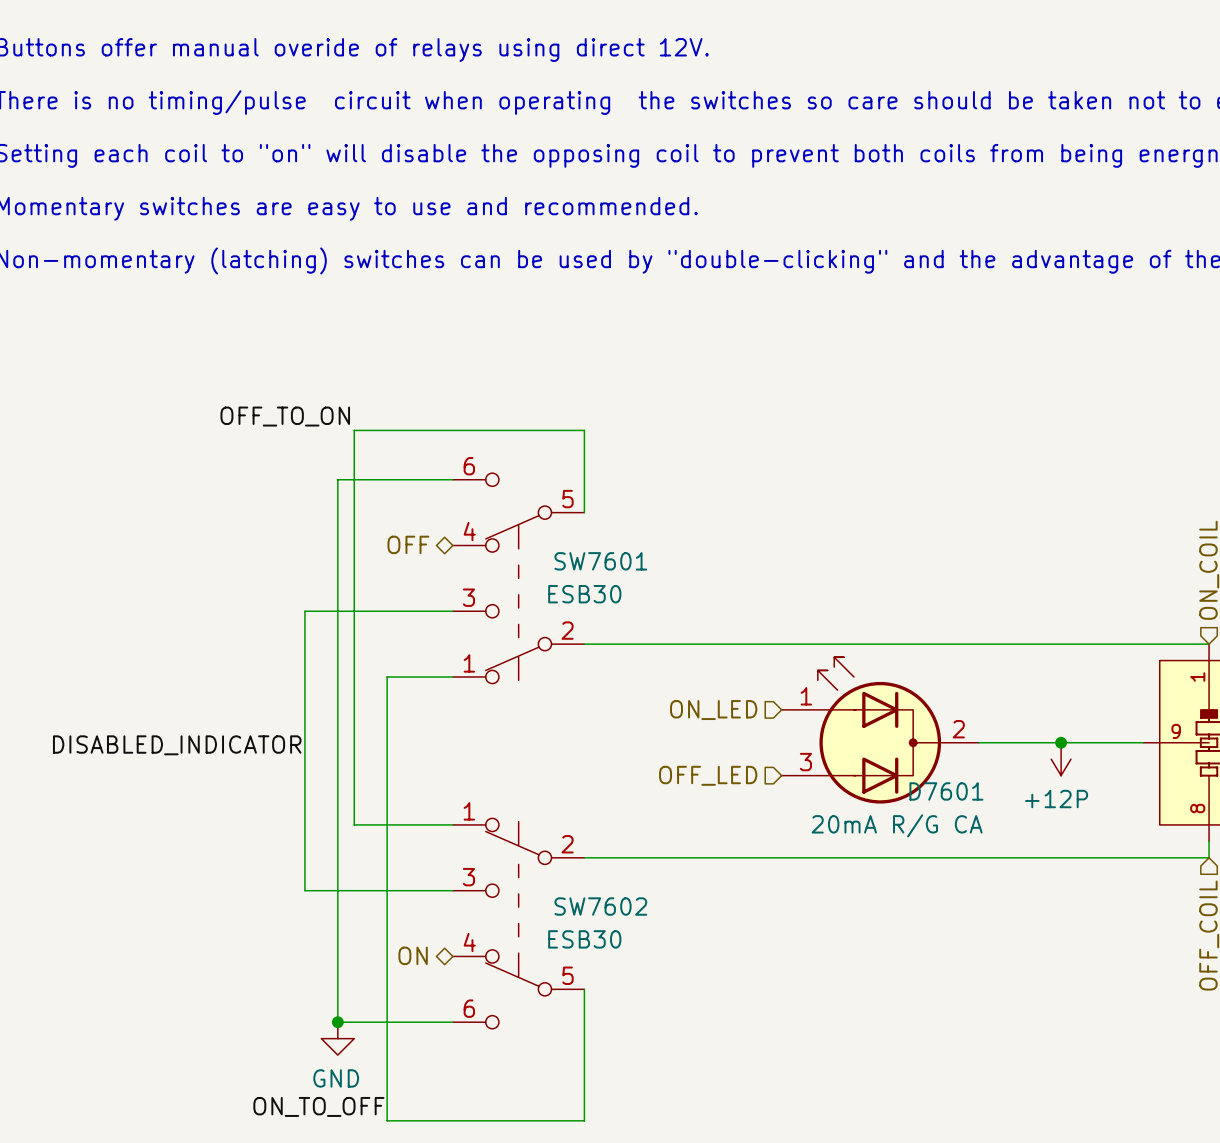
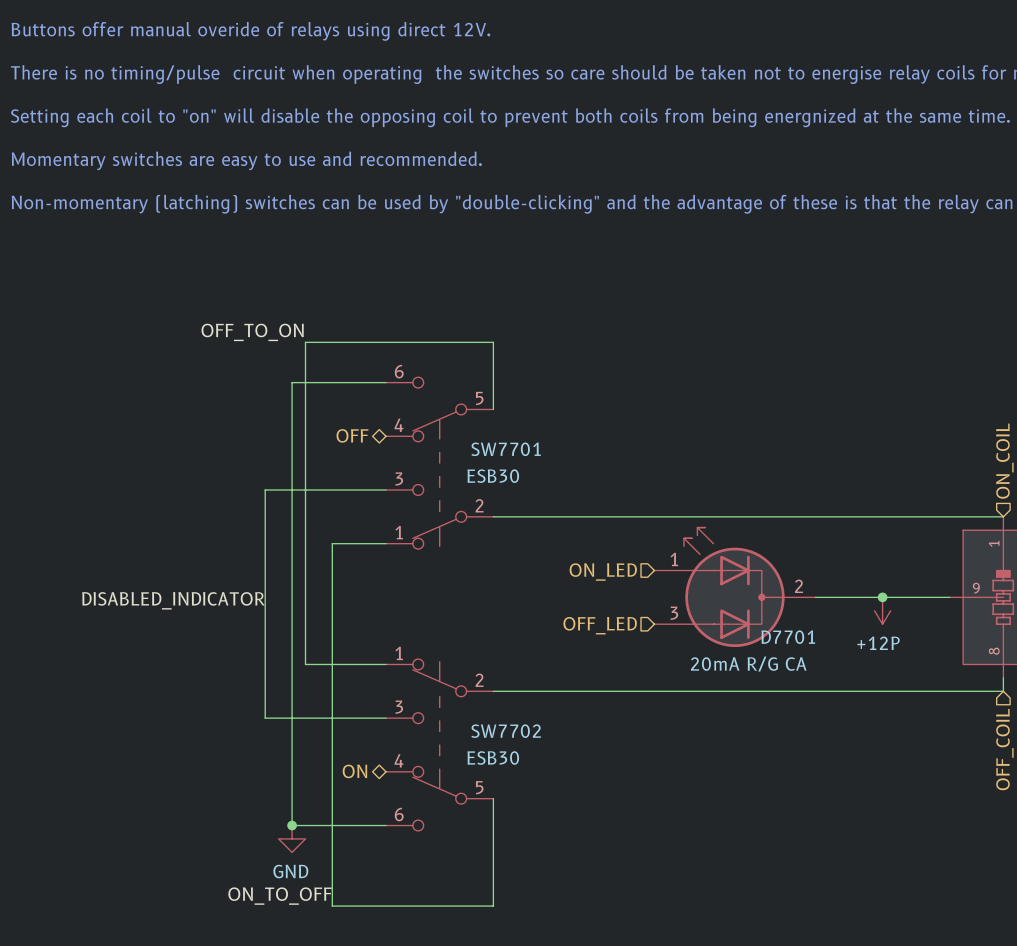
SW7601 name: SW7601 (600, 561) -> SW7701 (506, 449)
D7601 name: D7601 (946, 791) -> D7701 (788, 637)
SW7602 name: SW7602 (600, 906) -> SW7702 (506, 731)

